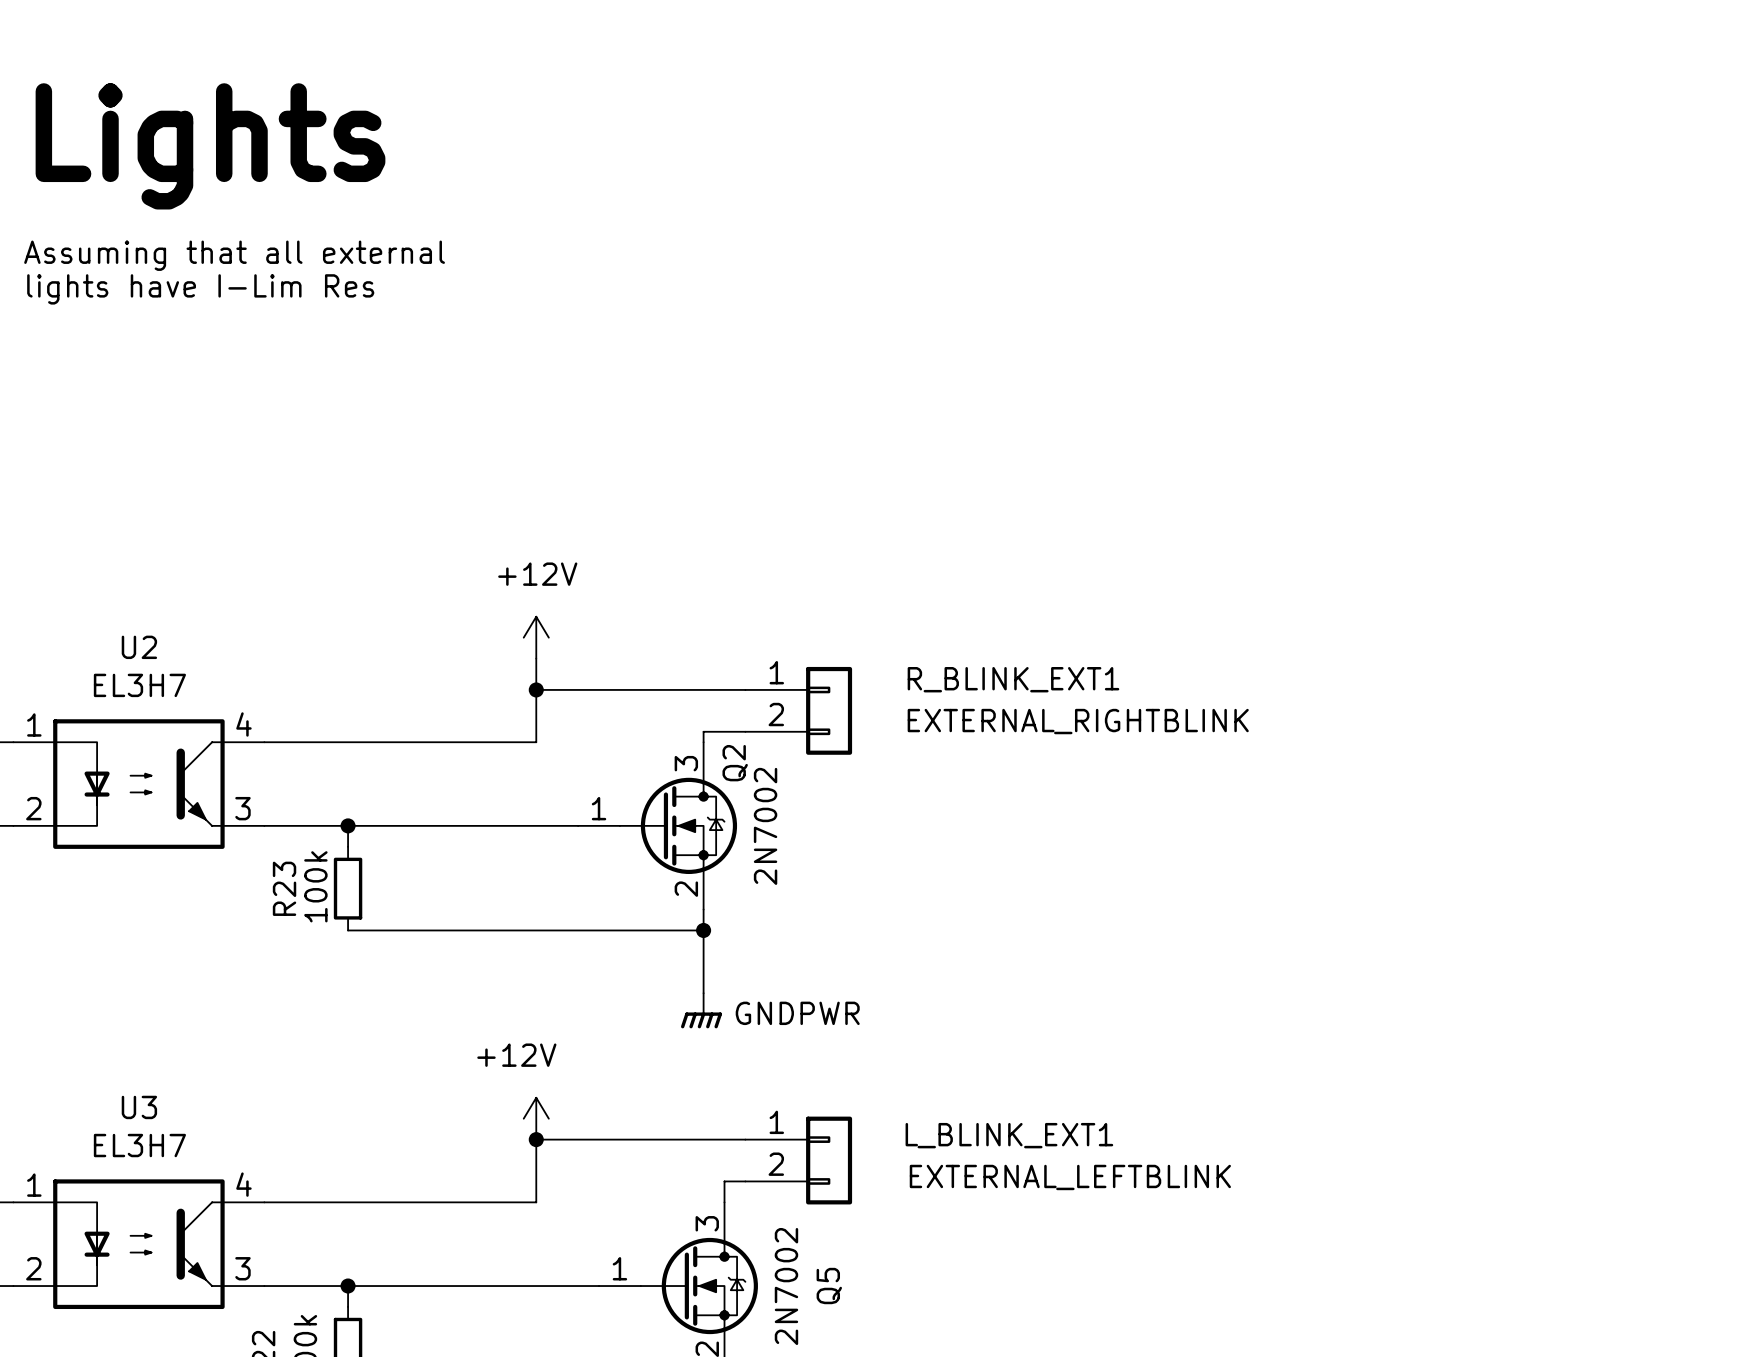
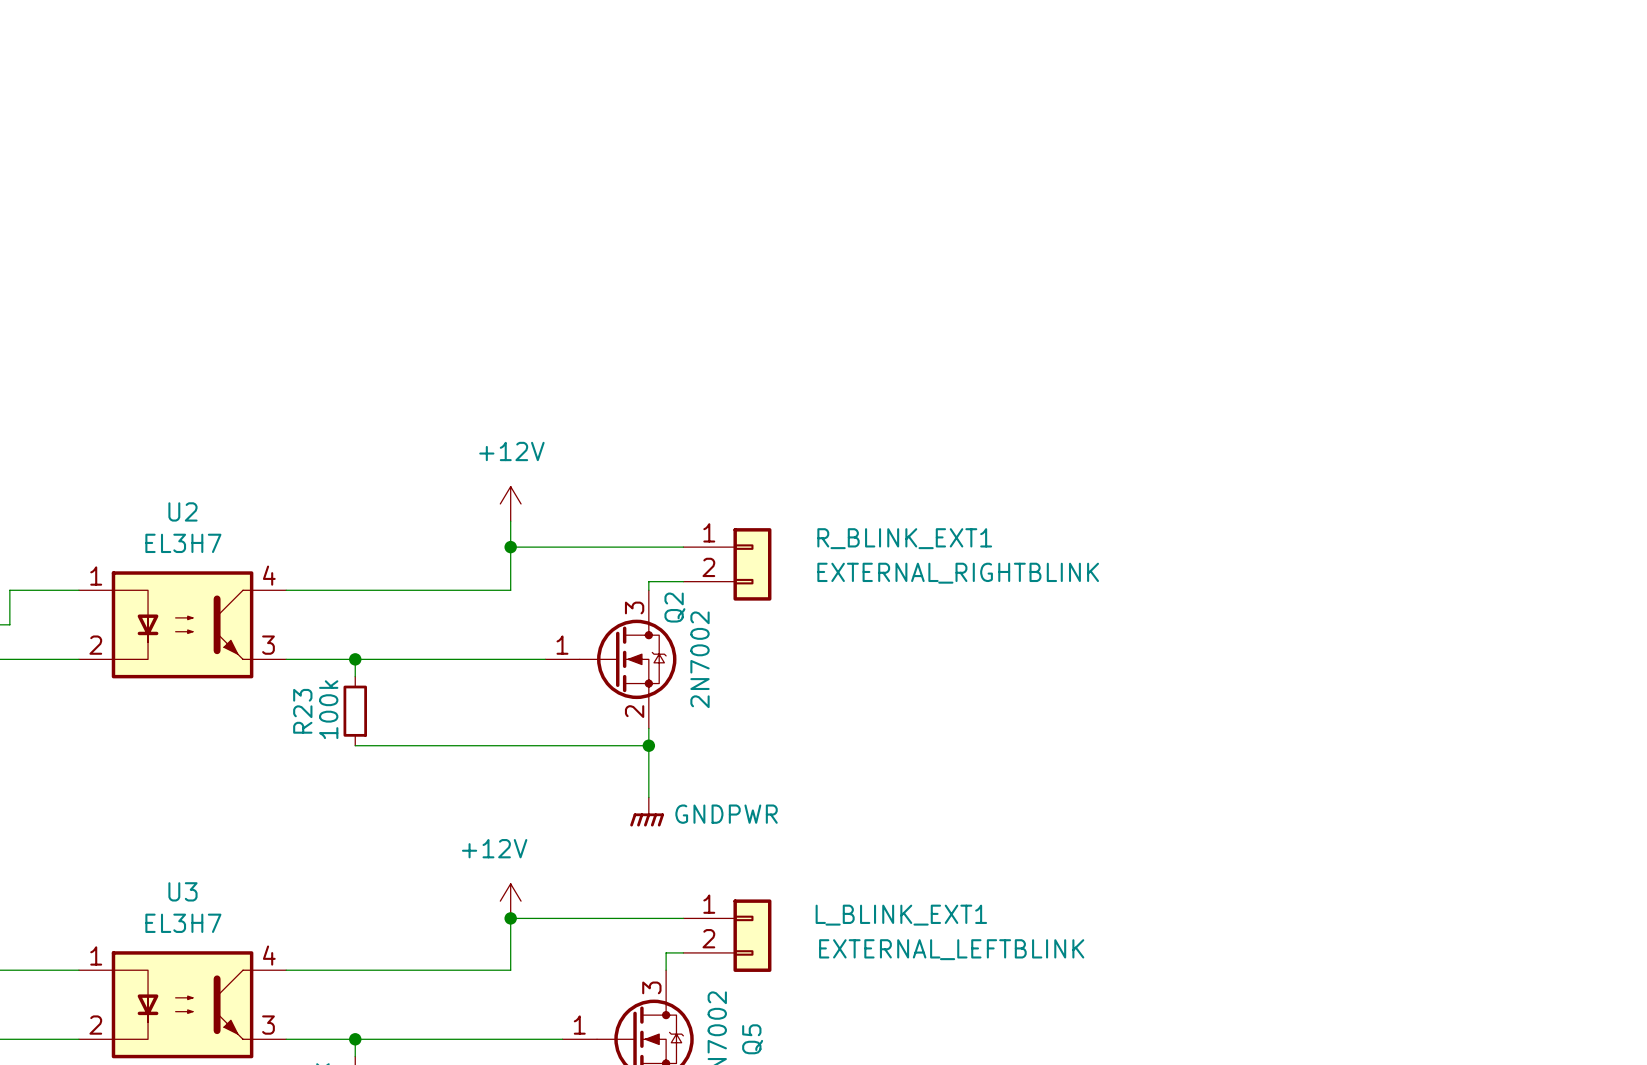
text: Lights (210, 146) -> none
text: Assuming that all external (234, 255) -> none
text: lights have I-Lim Res (200, 289) -> none

